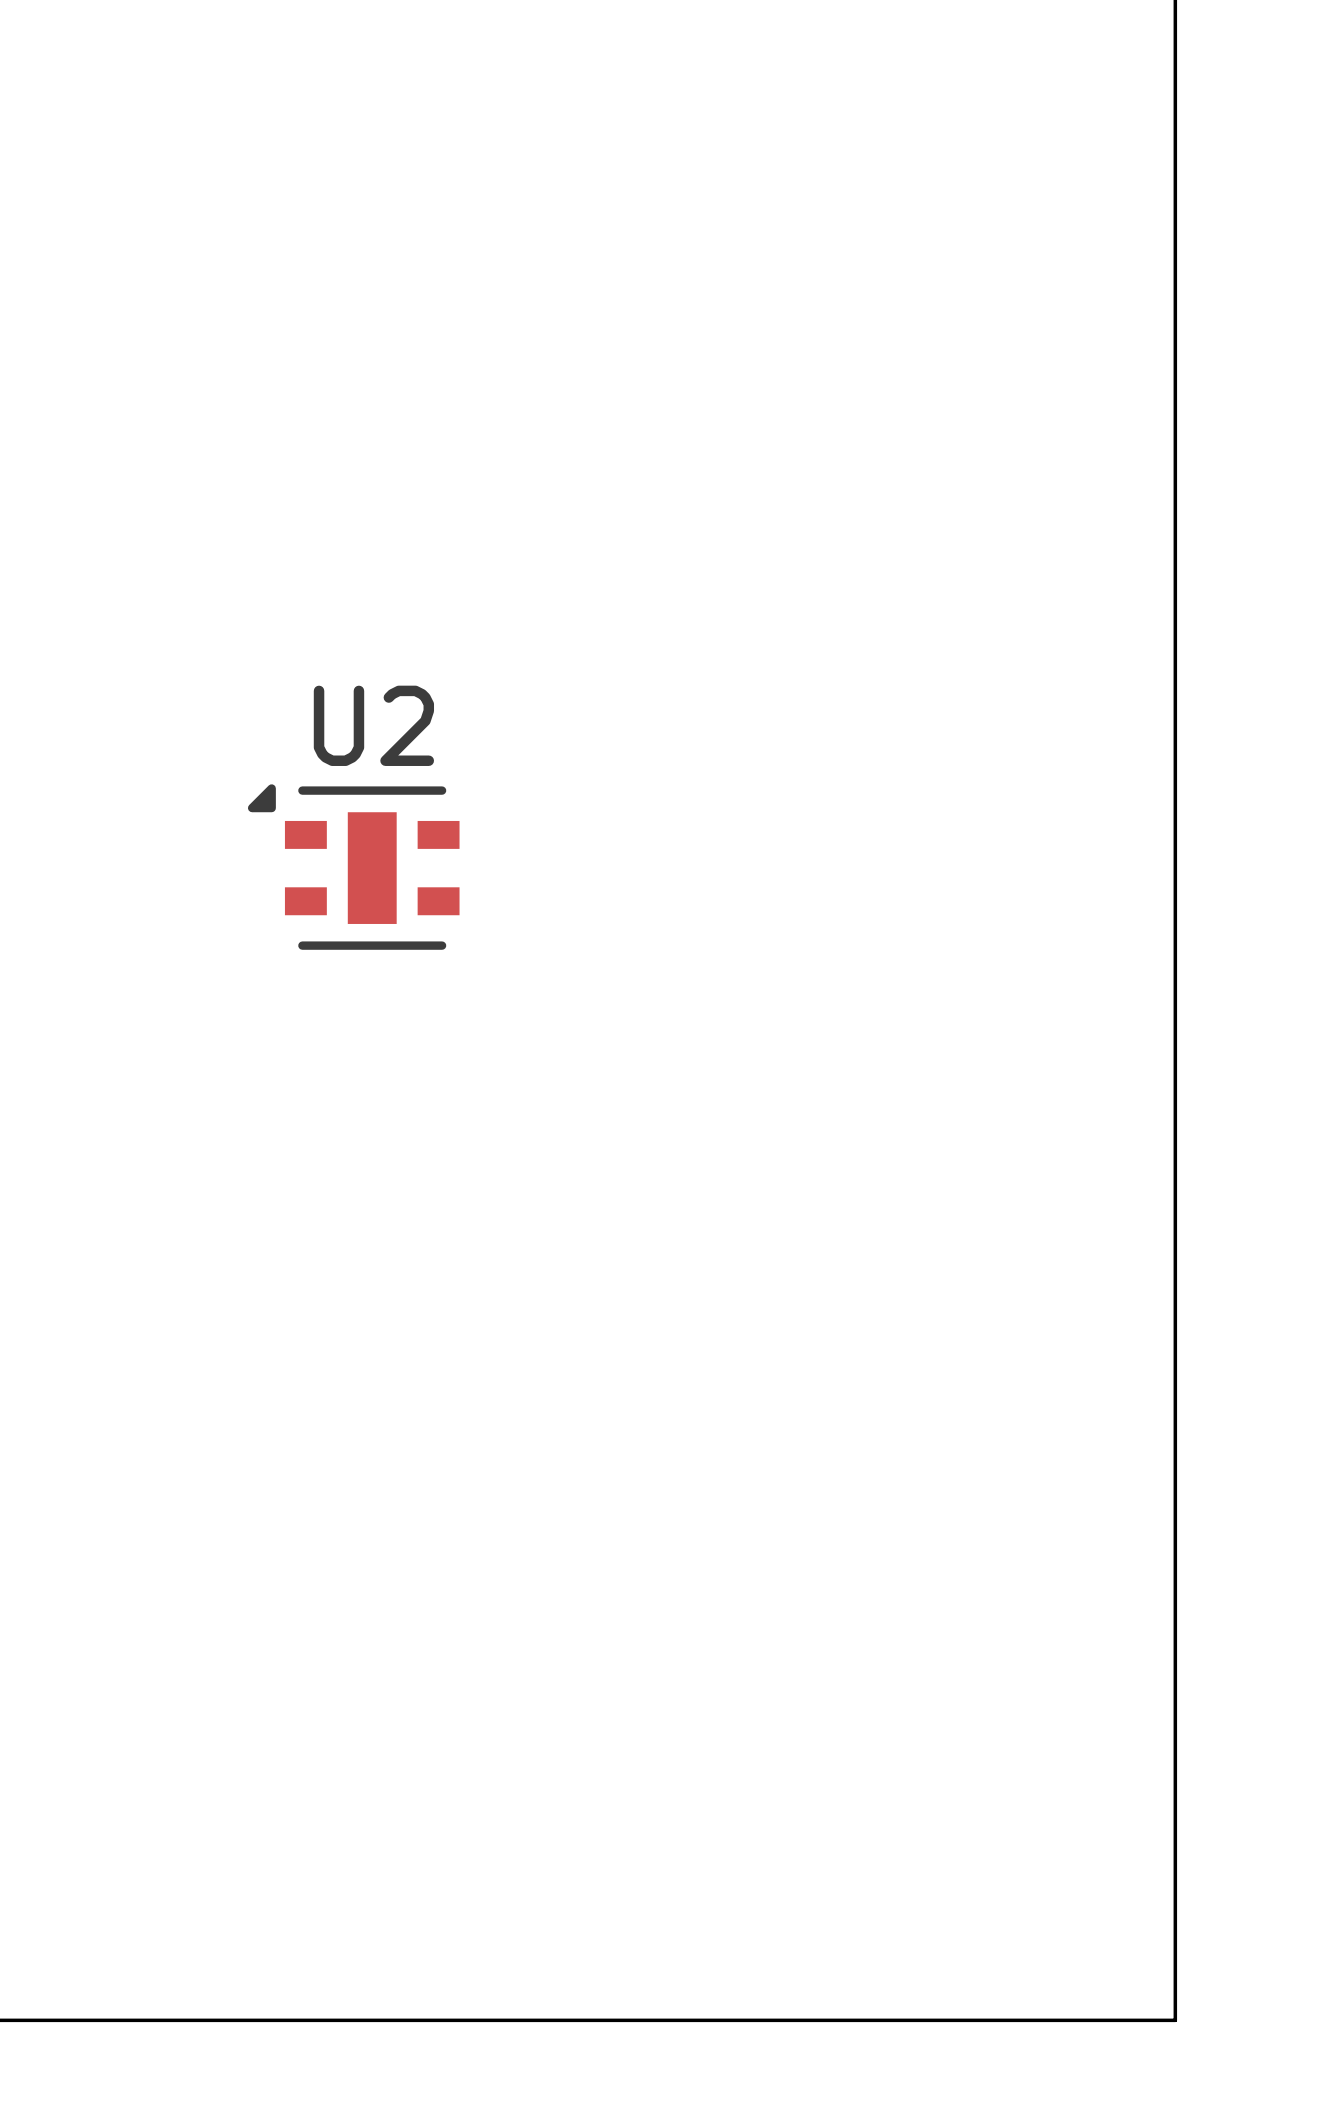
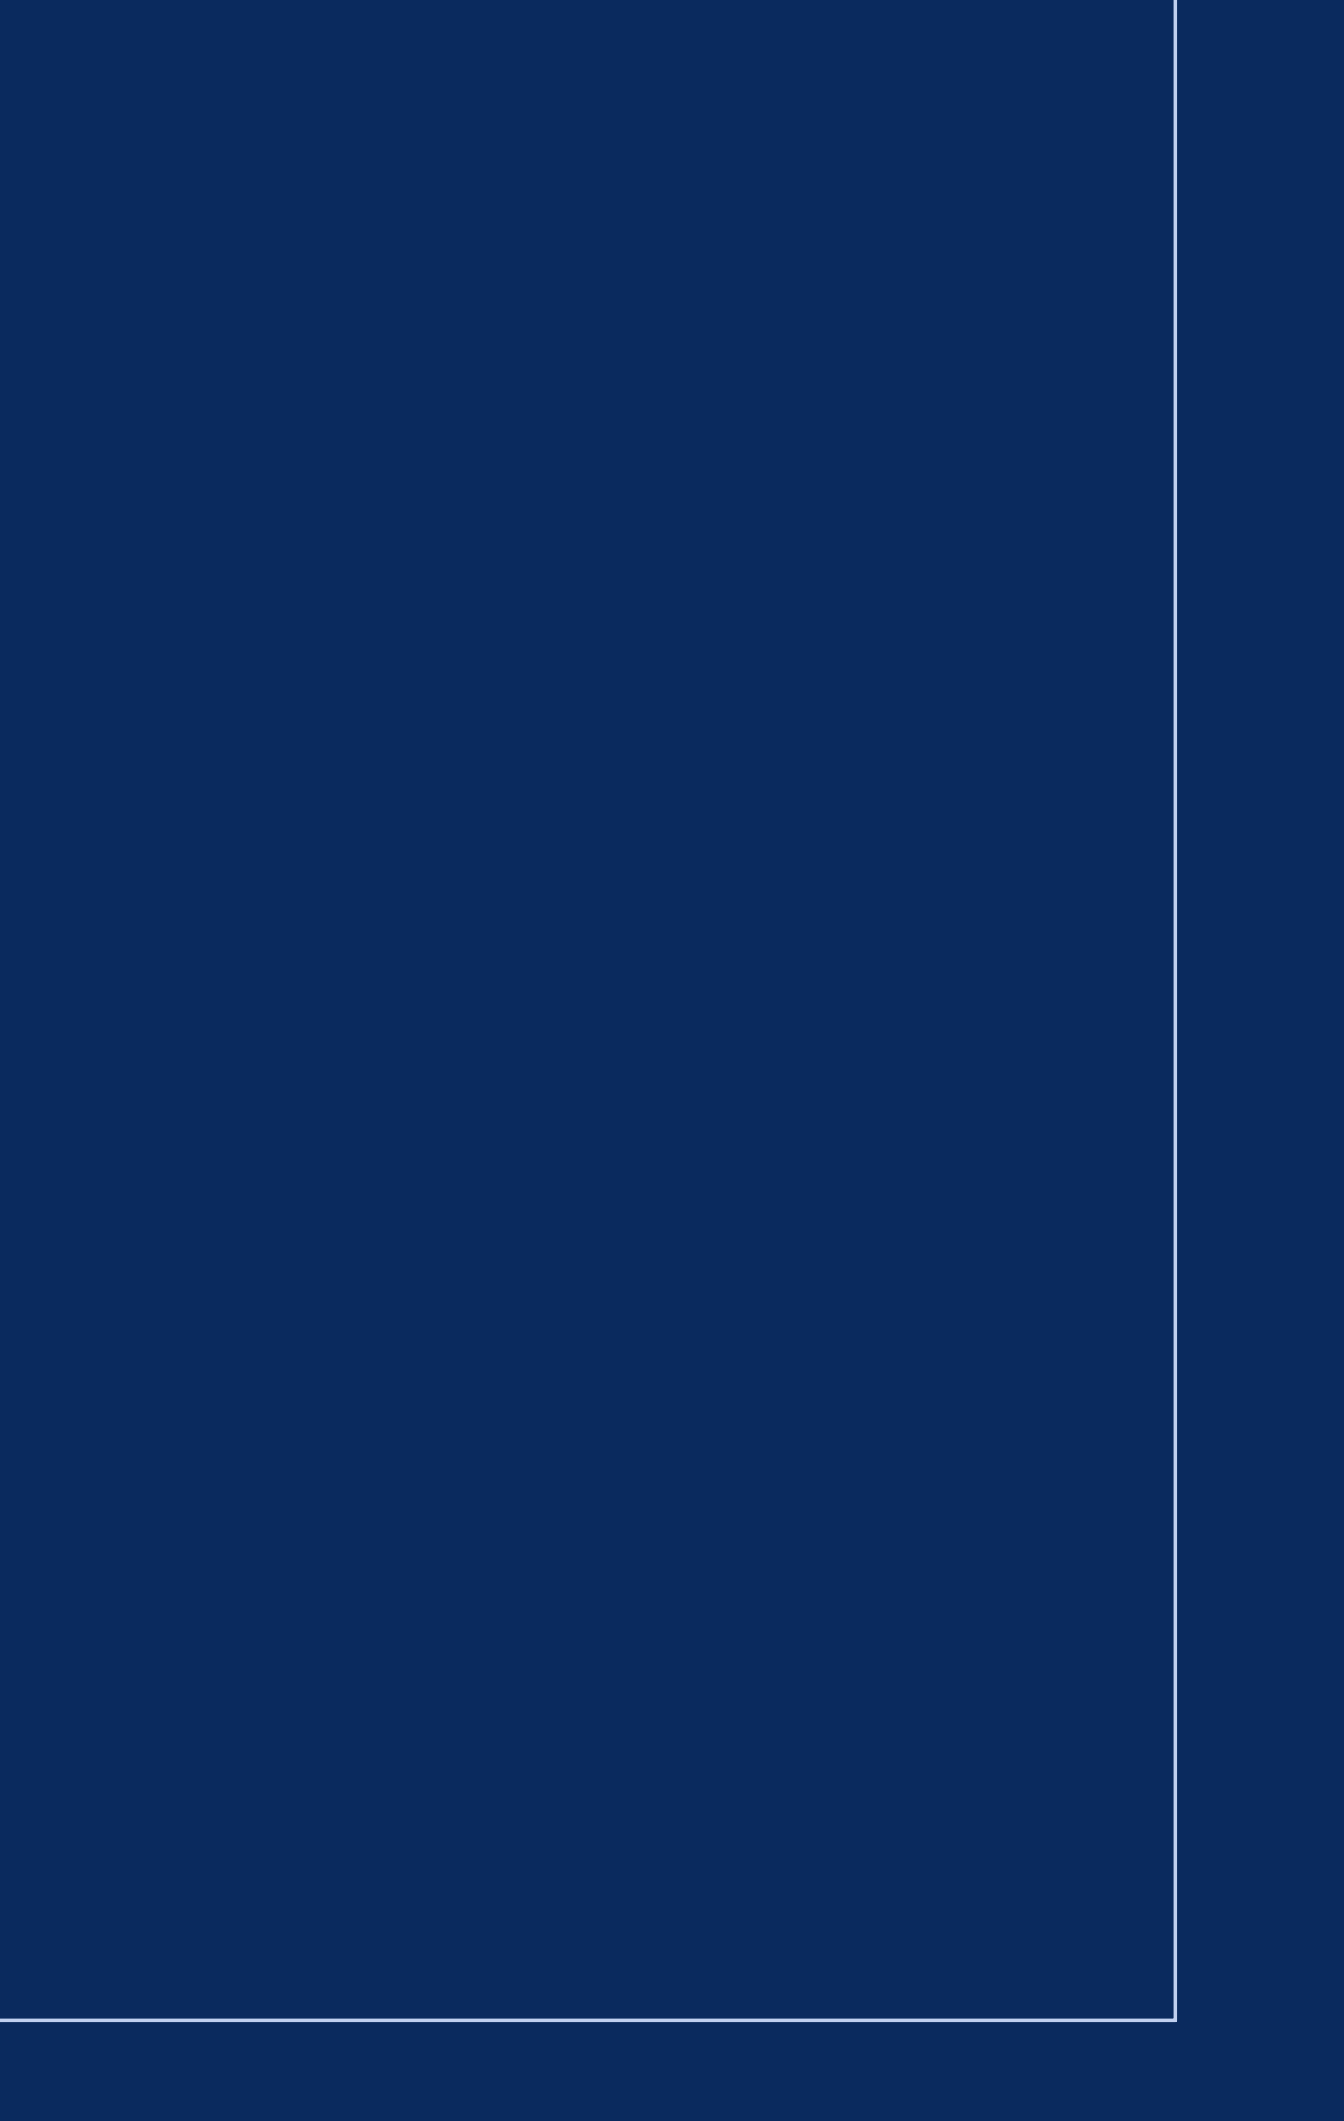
U2: (353, 867) -> none

